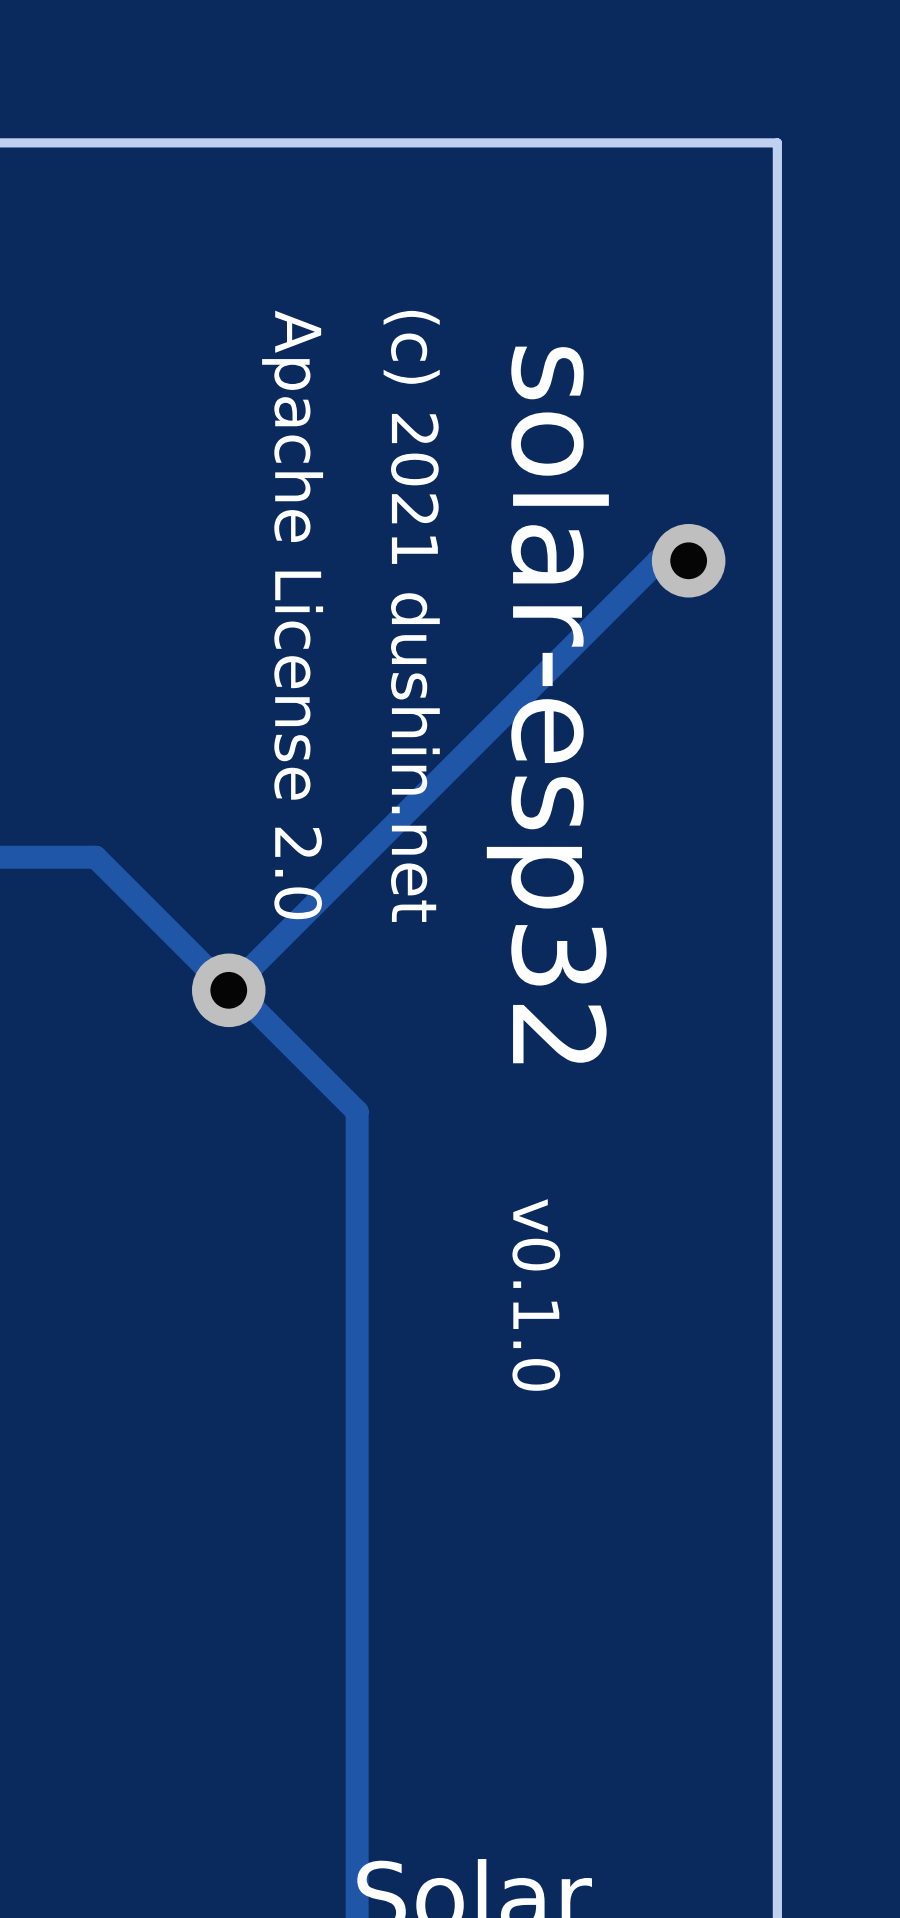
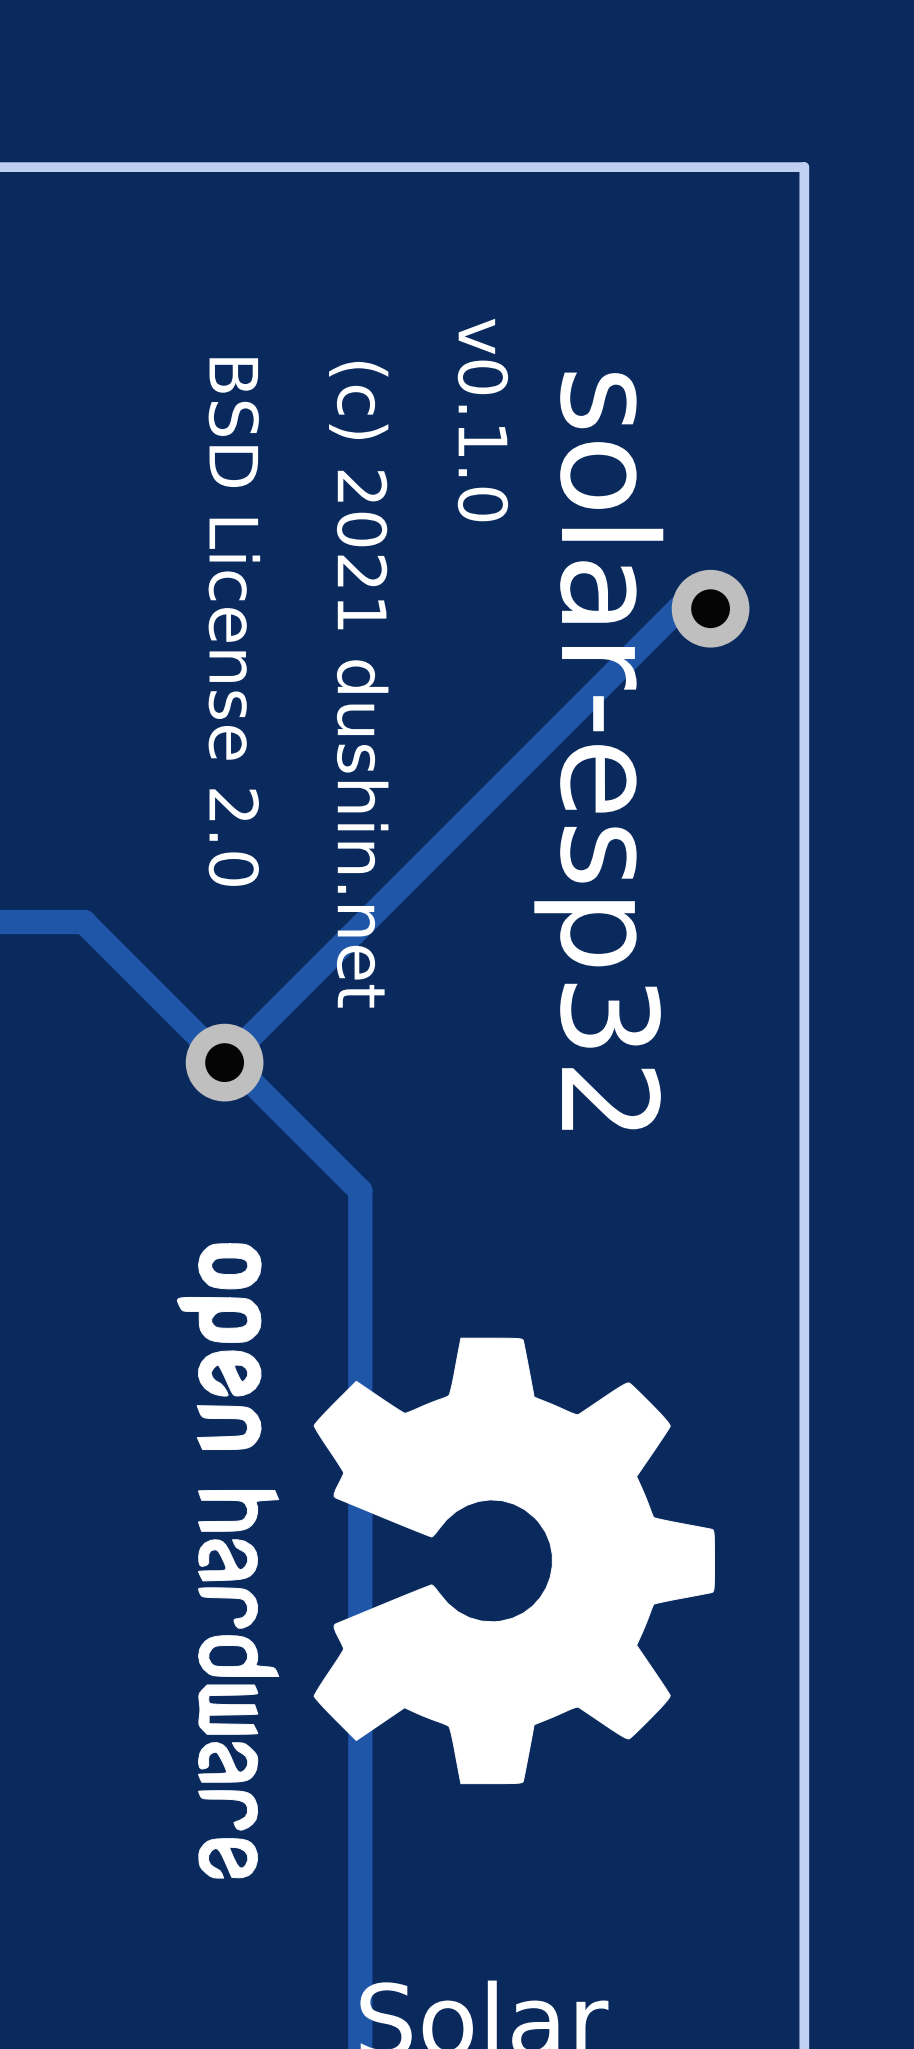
text: Apache License 2.0 (292, 614) -> BSD License 2.0 (234, 622)
text position: (c) 2021 dushin.net (411, 616) -> (c) 2021 dushin.net (358, 684)
text position: solar-esp32 (547, 704) -> solar-esp32 (598, 751)
drawing: none -> [177, 1243, 715, 1879]
text position: v0.1.0 (536, 1294) -> v0.1.0 (482, 420)

